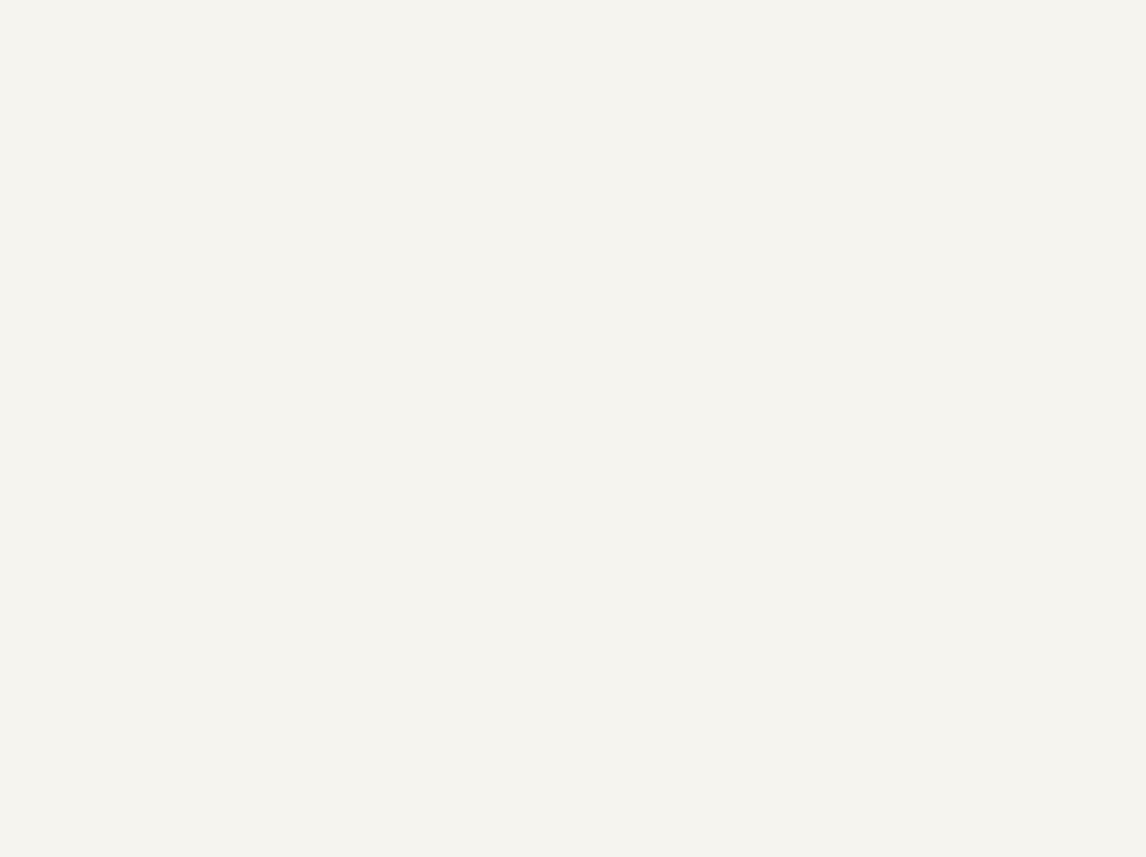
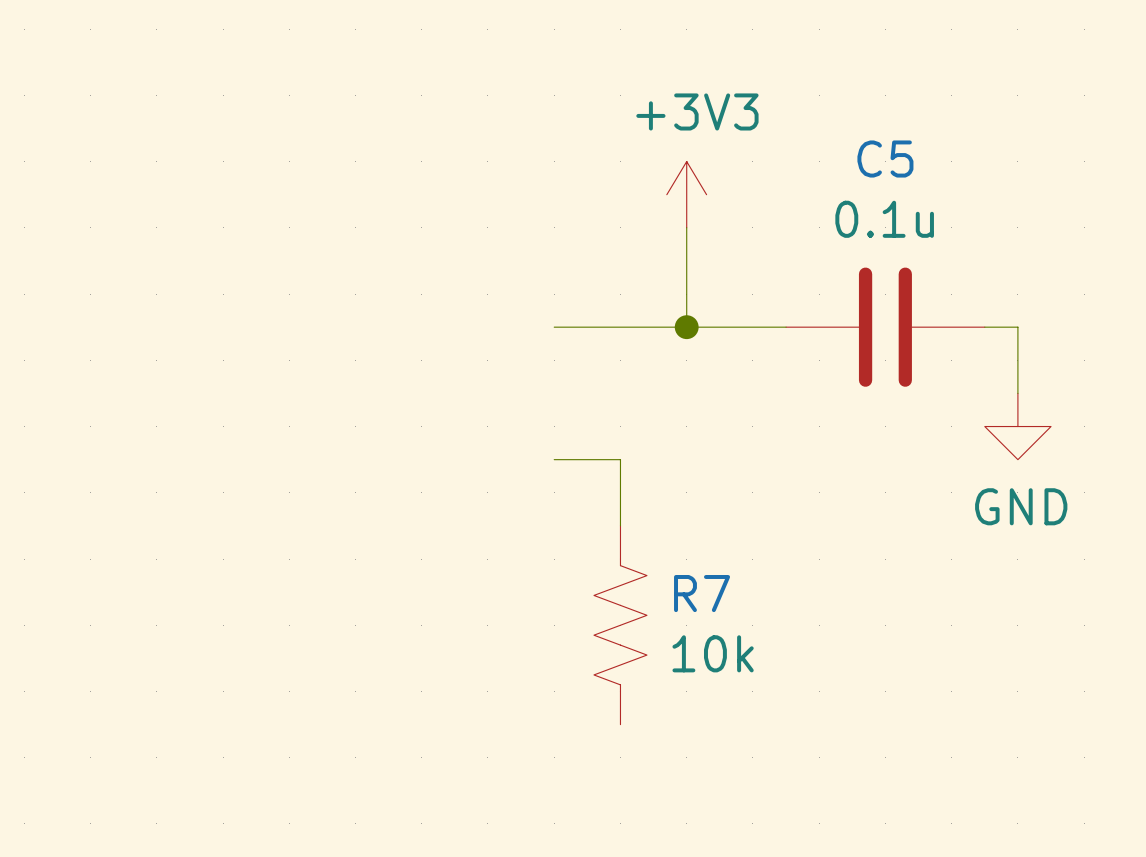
power symbol: none -> +3V3 (686, 194)
wire: none -> (686, 227) (686, 327)
wire: none -> (554, 327) (786, 327)
junction: none -> (686, 327)
C5: none -> 0.1u (885, 327)
wire: none -> (984, 327) (1017, 327) (1017, 393)
power symbol: none -> GND (1017, 426)
wire: none -> (554, 459) (620, 459) (620, 525)
R7: none -> 10k (620, 625)

